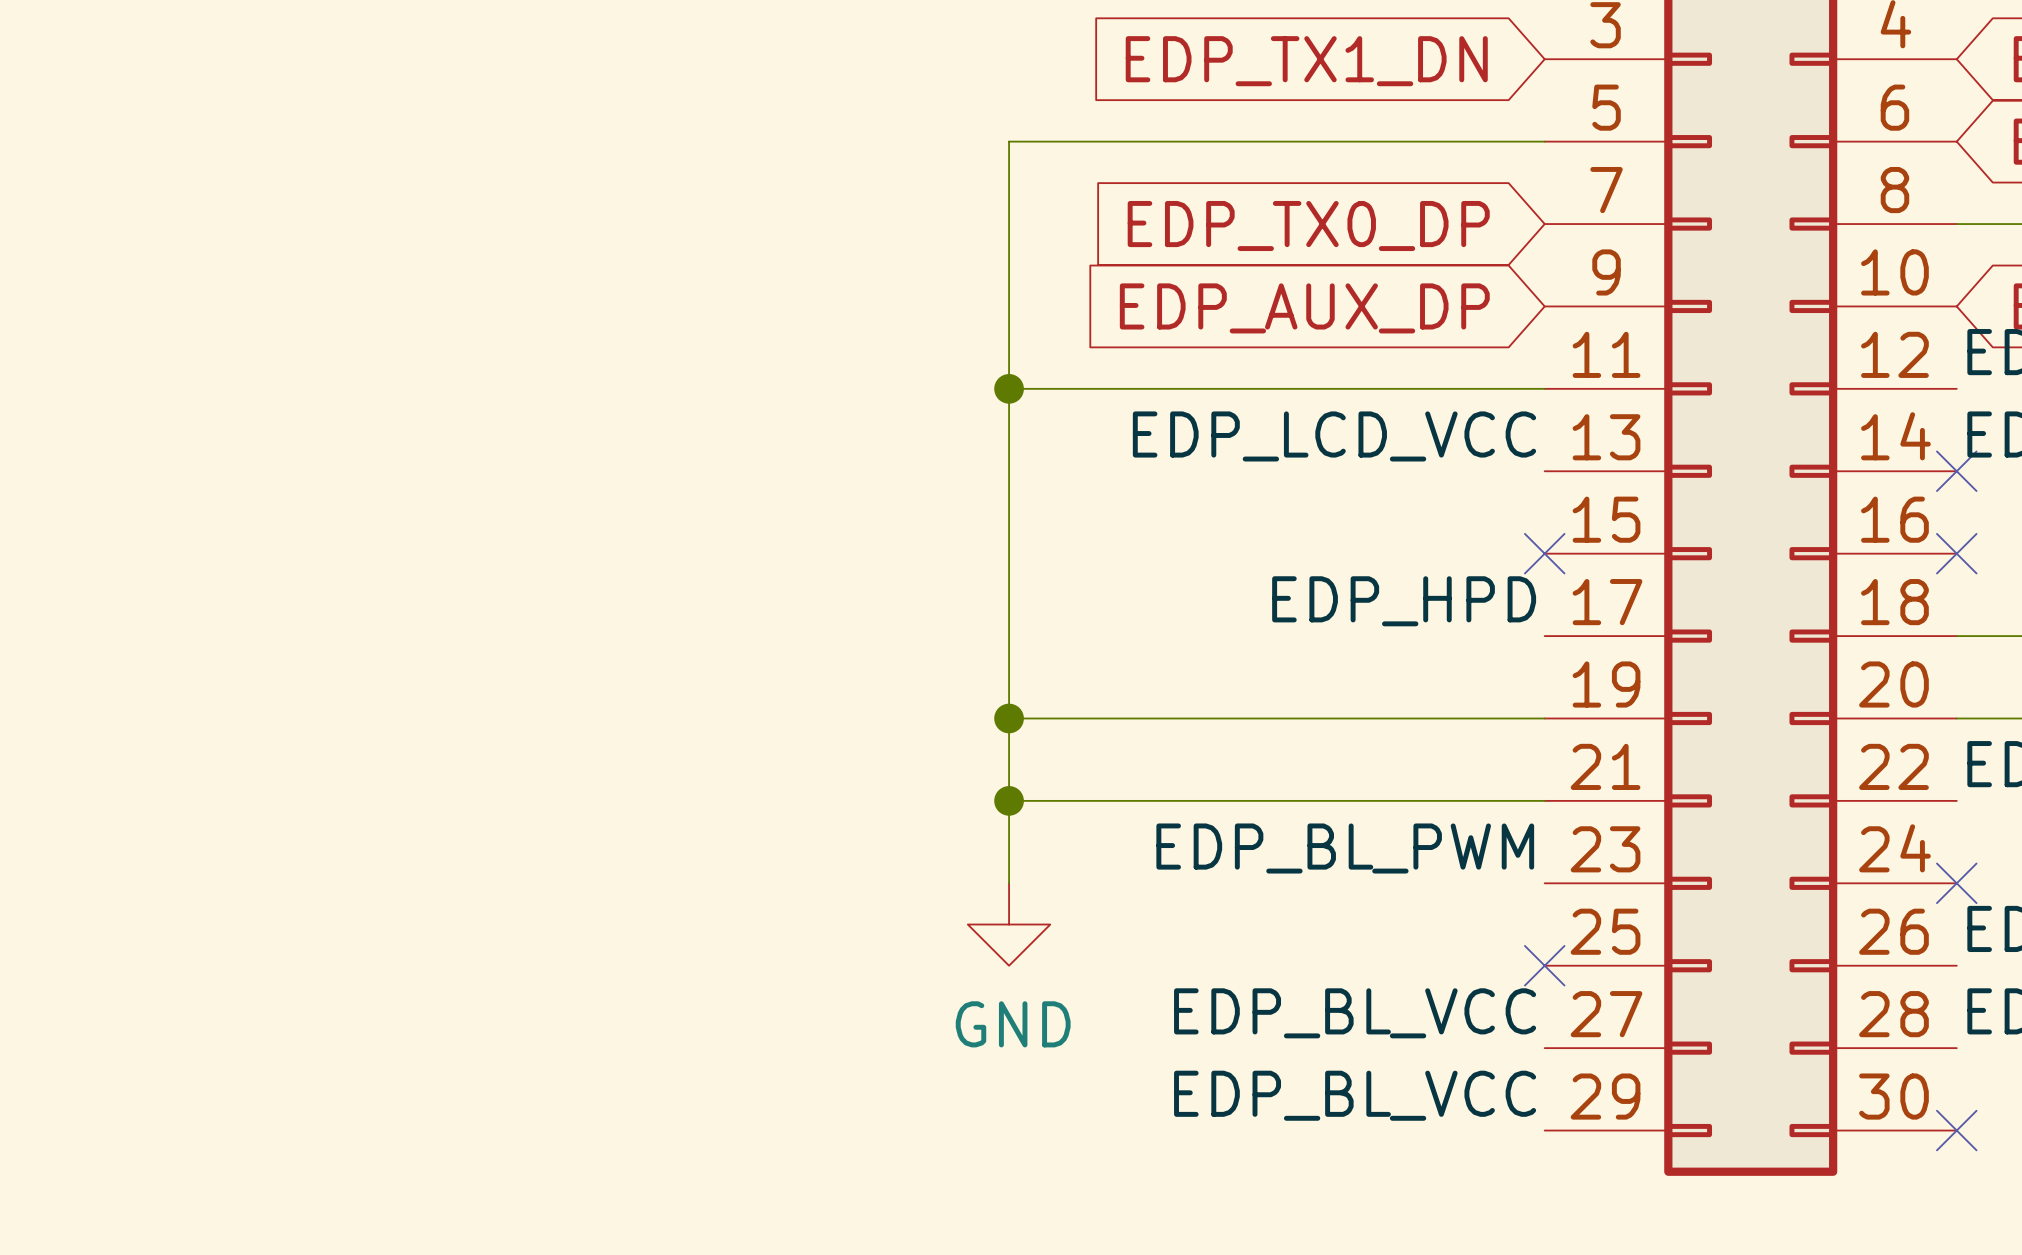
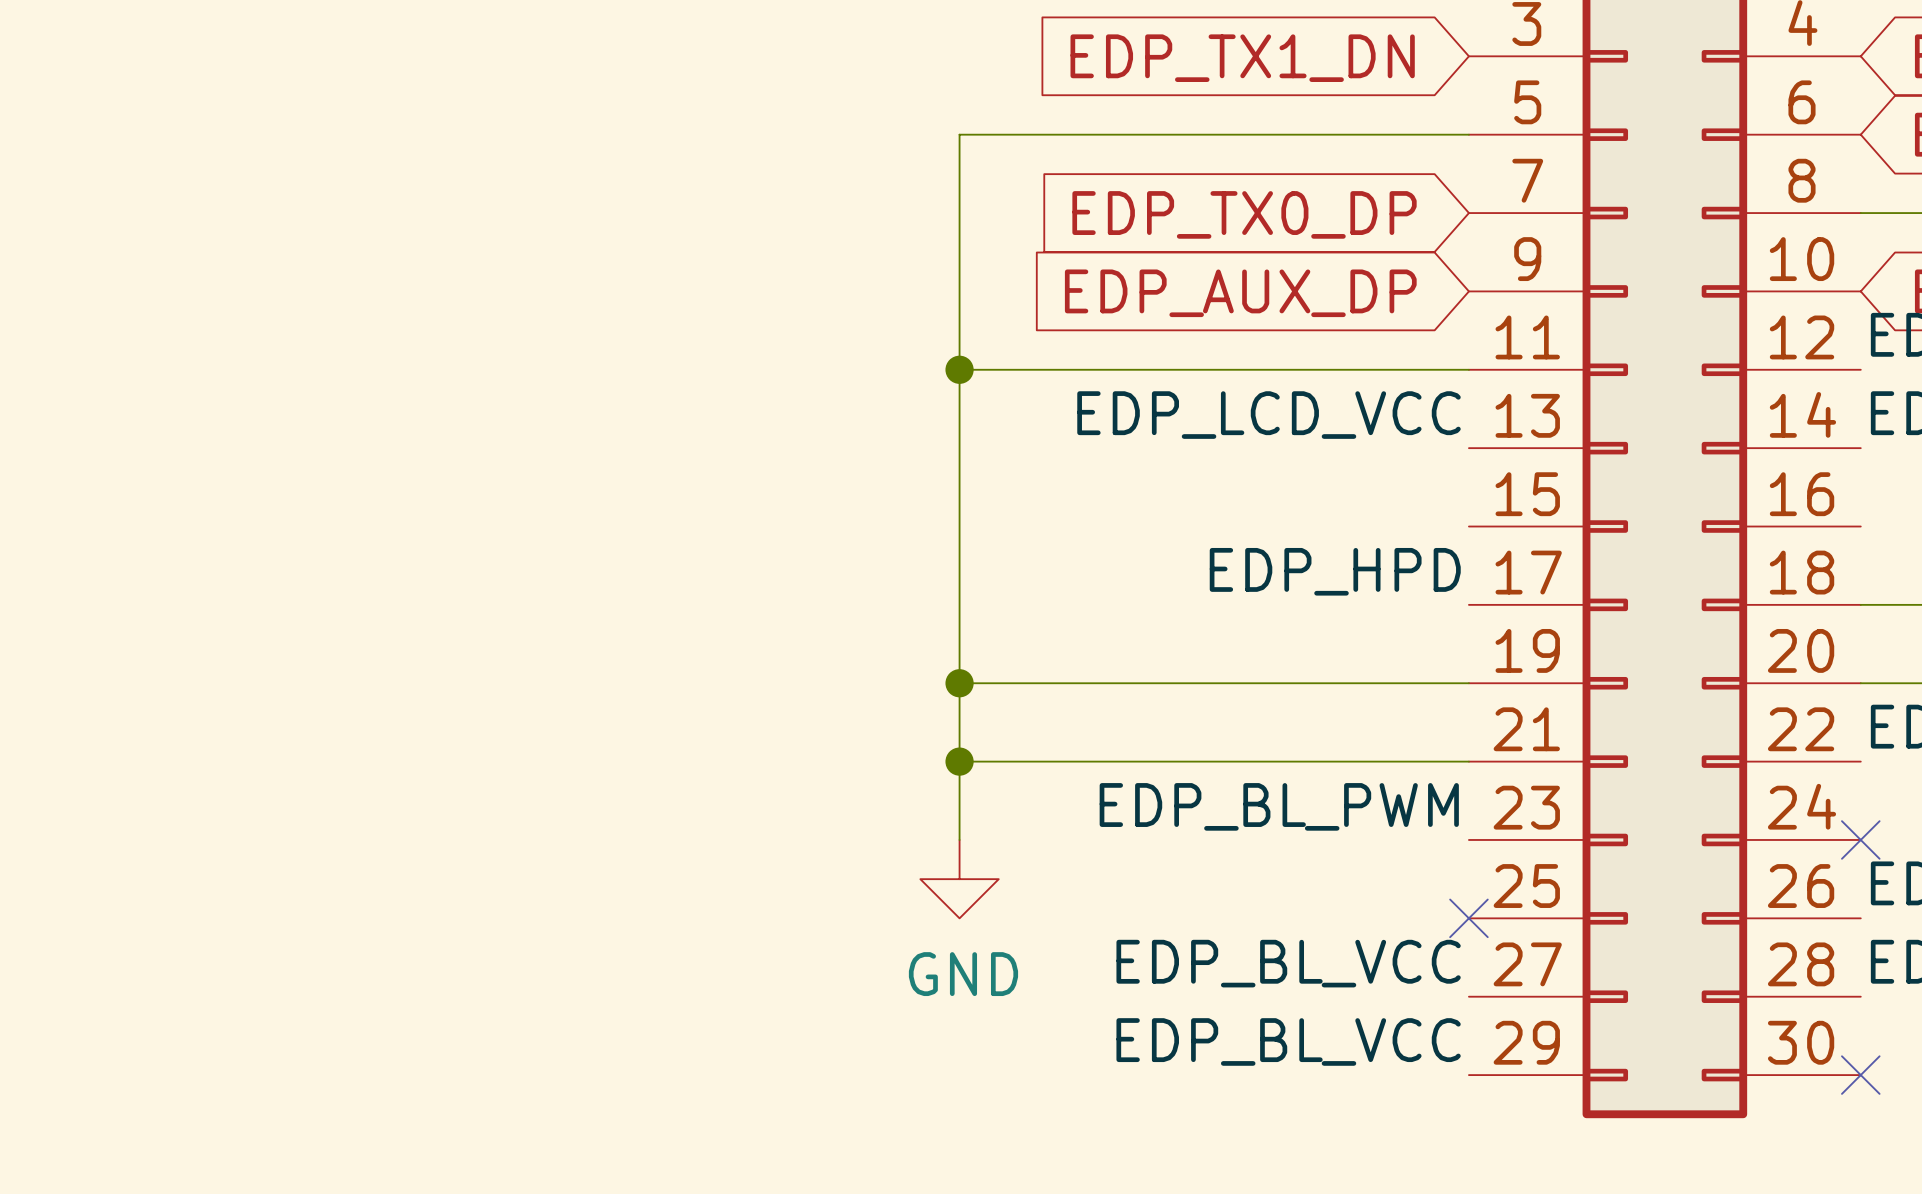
no-connect mark: (1956, 471) -> none
no-connect mark: (1544, 553) -> none
no-connect mark: (1956, 553) -> none

